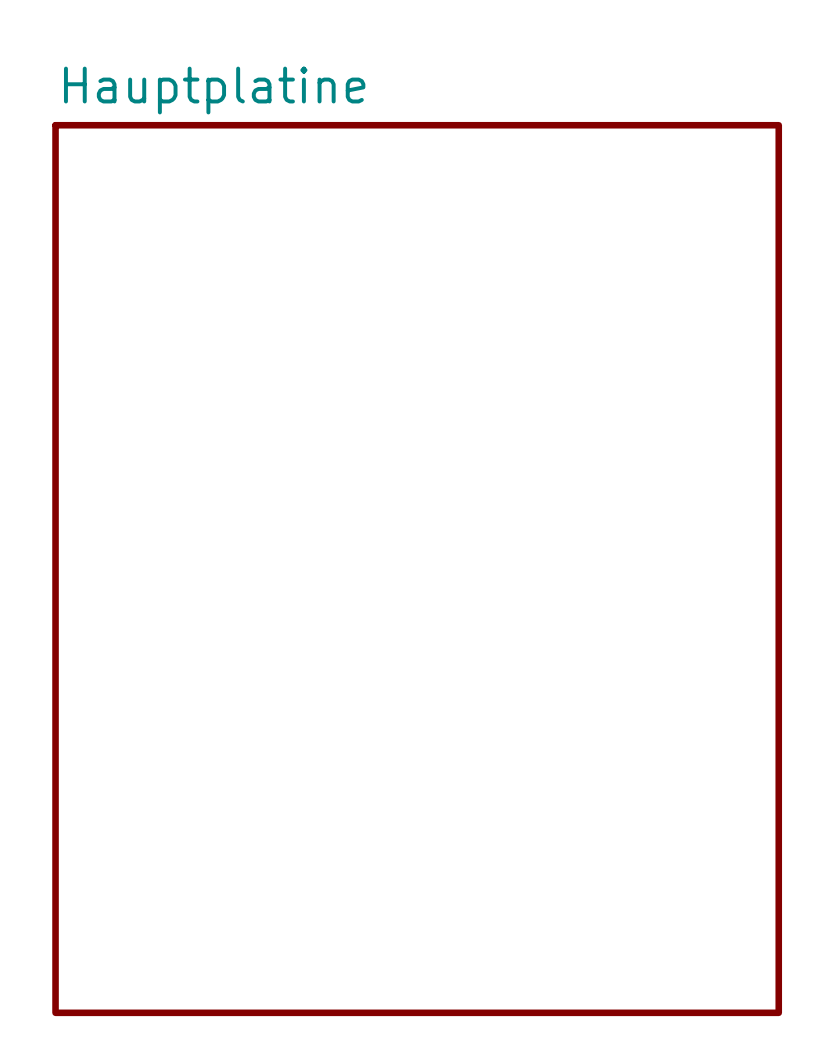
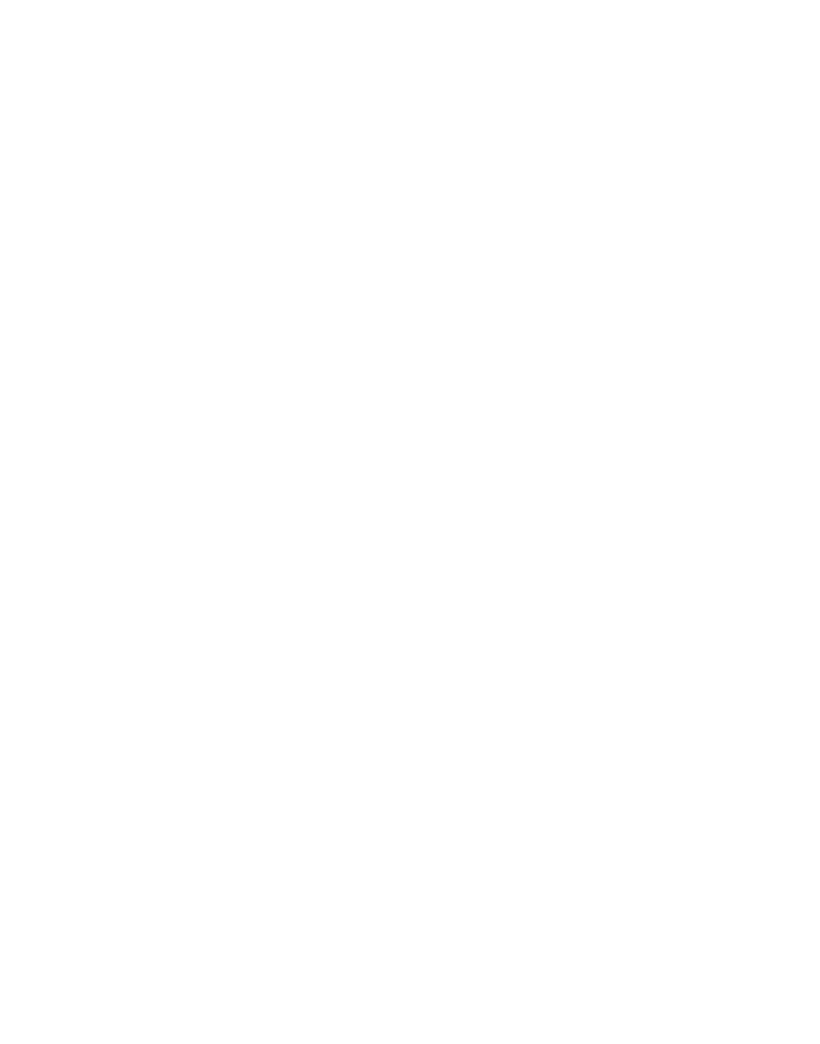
sheet Hauptplatine: (417, 569) -> none

